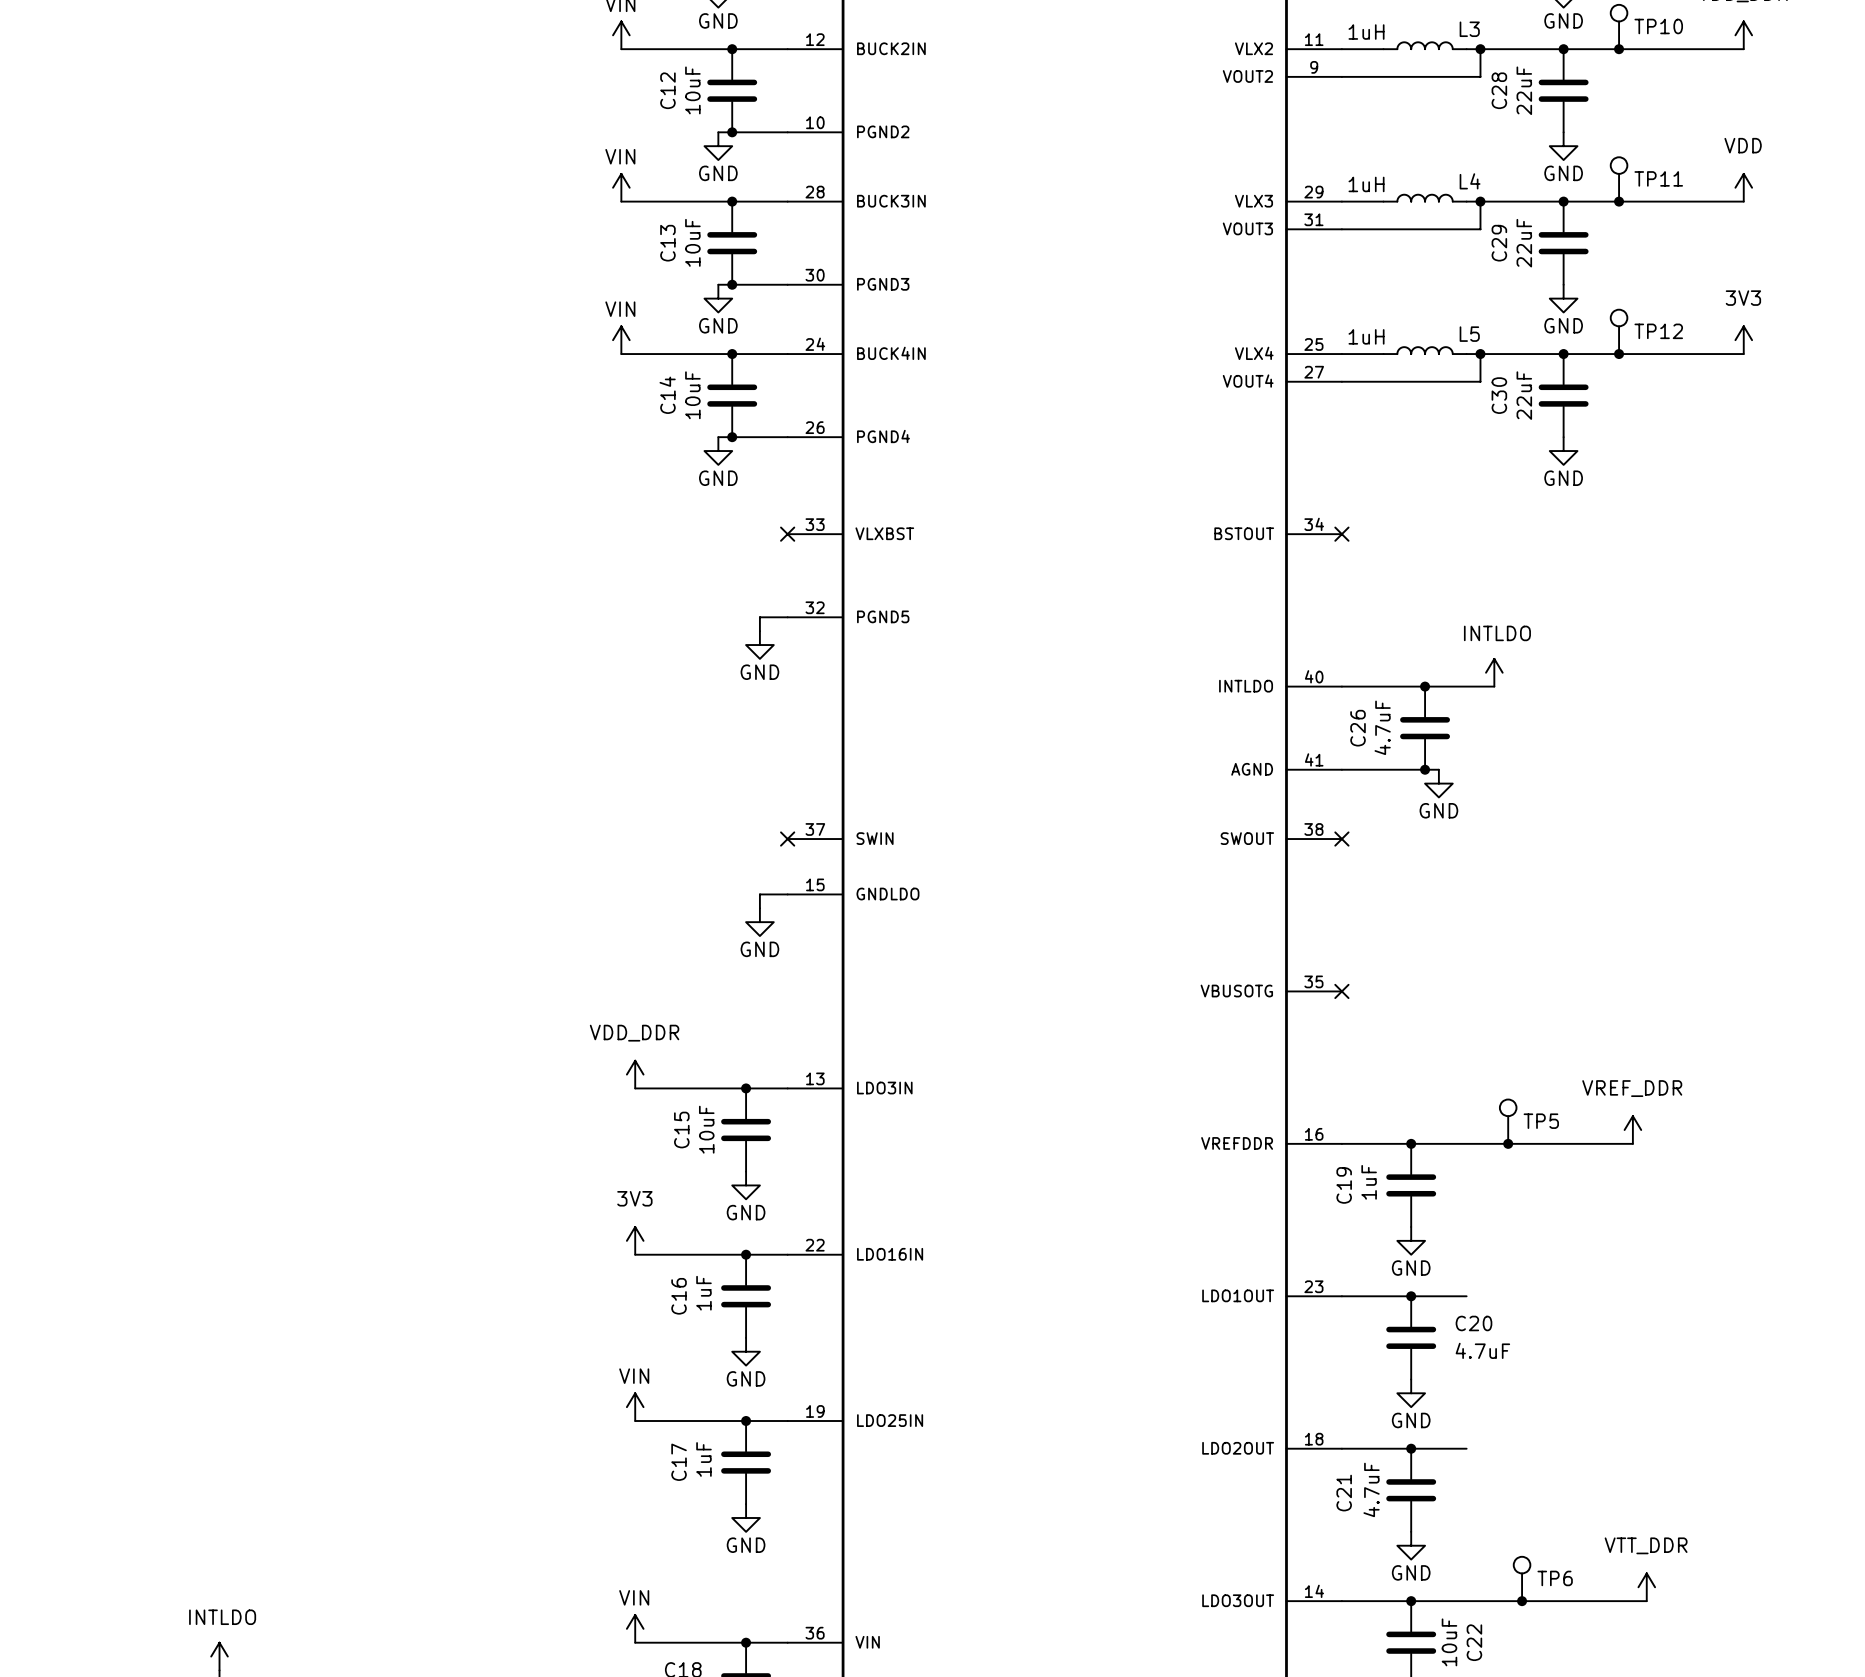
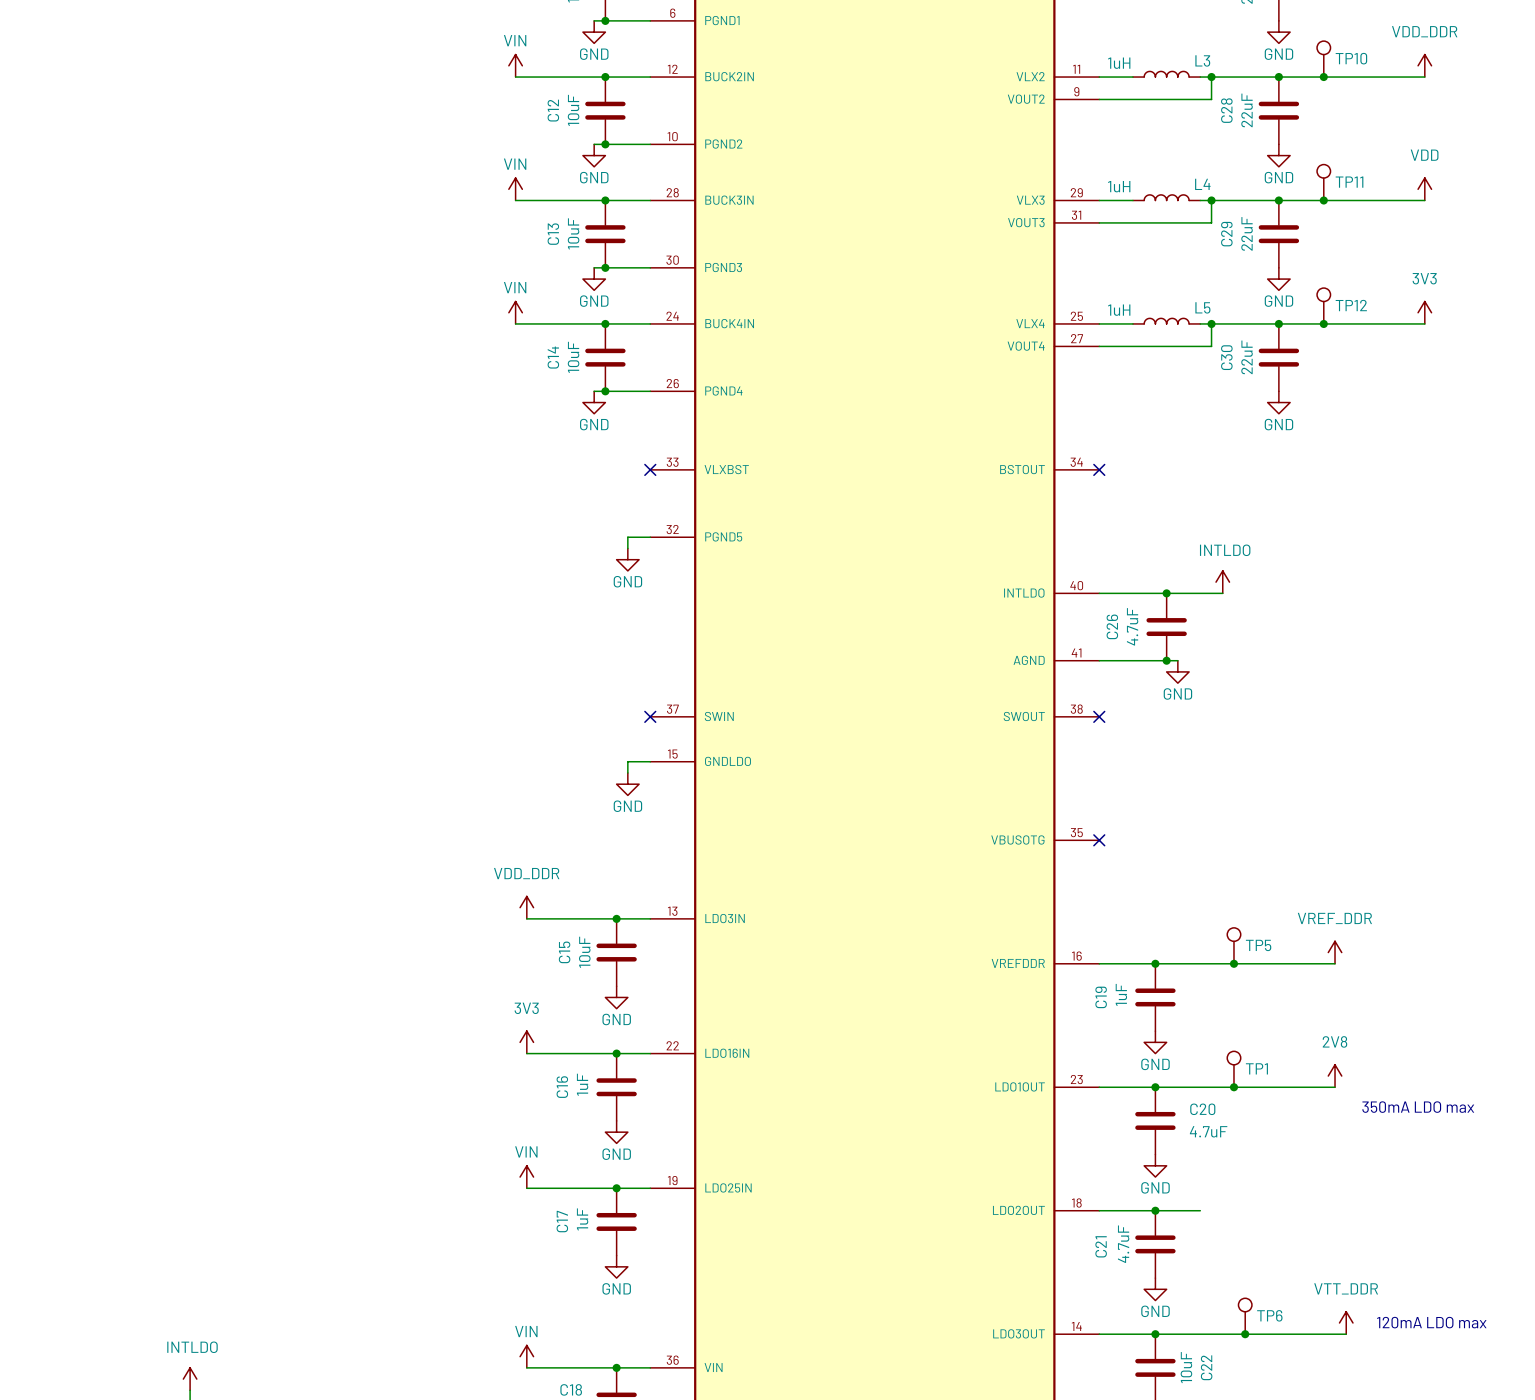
TP1: none -> (1233, 1069)
power symbol: none -> 2V8 (1335, 1076)
wire: none -> (1200, 1087) (1335, 1087)
junction: none -> (1233, 1087)
text: none -> 350mA LDO max (1418, 1107)
text: none -> 120mA LDO max (1431, 1322)

